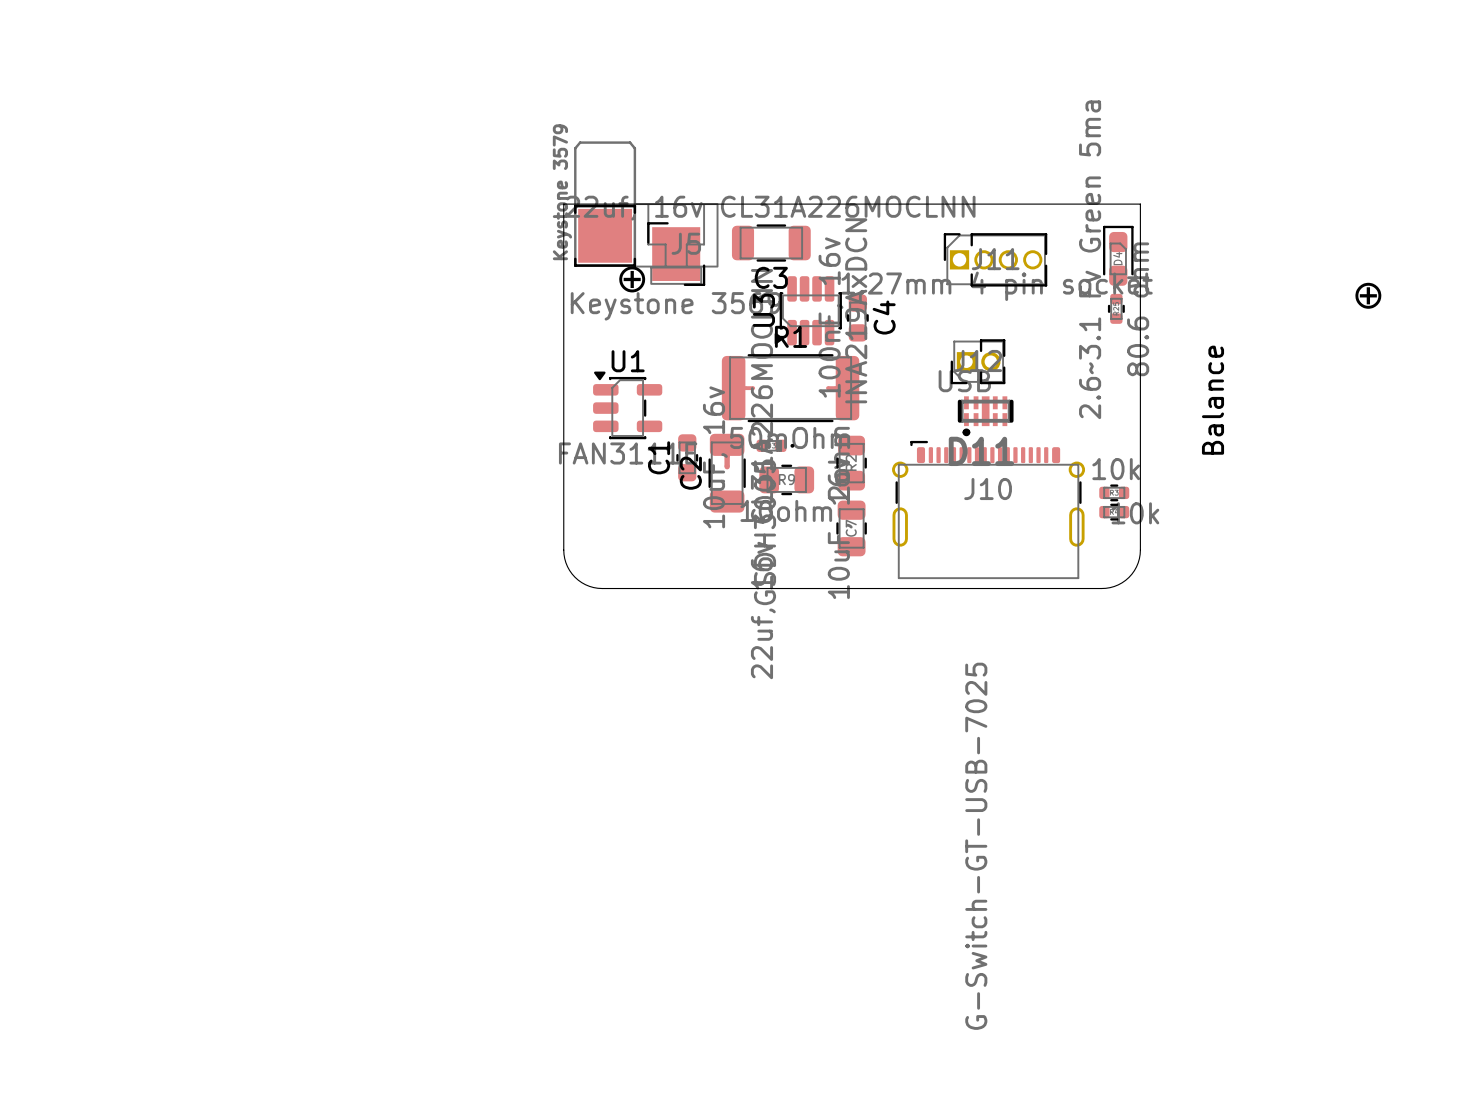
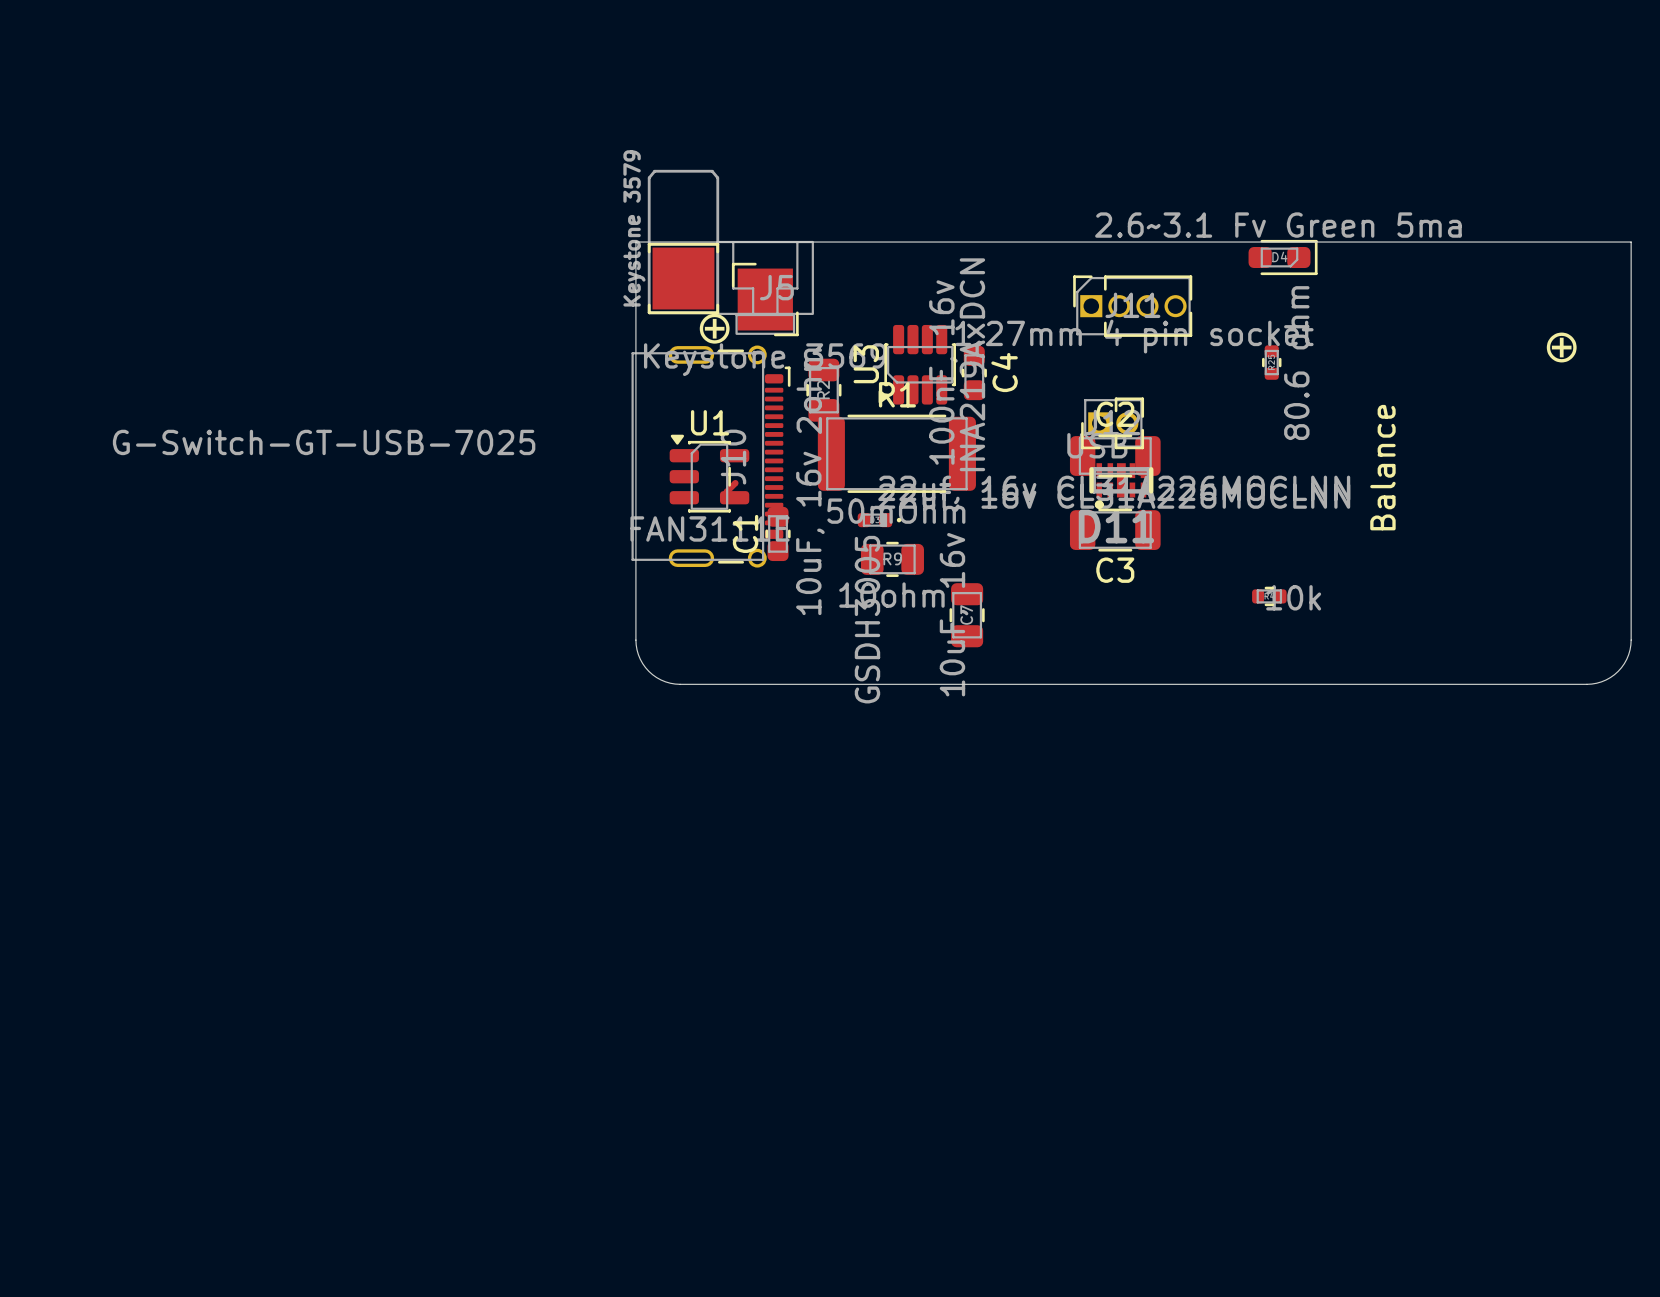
board edge: (1140, 204) (1140, 554) (1136, 566) (1128, 577) (1118, 584) (1101, 588) -> (1299, 242) (1631, 242) (1630, 645) (1626, 659) (1618, 671) (1606, 679) (1591, 684) (1254, 684)
C3 position: (771, 243) -> (1115, 530)
D4 rotation: 0° (1118, 255) -> 90° clockwise (1283, 257)
D4 position: (1118, 255) -> (1283, 257)
part: (749, 388) -> none
part: (831, 388) -> none
part: none -> (731, 487)
part: (727, 461) -> none
R2 position: (851, 463) -> (823, 390)
C2 rotation: 0° (727, 473) -> 90° clockwise (1115, 455)
C2 position: (727, 473) -> (1115, 455)
part: 10k (1114, 492) -> none
J10 rotation: 0° (988, 510) -> 90° clockwise (711, 456)
J10 position: (988, 510) -> (711, 456)

